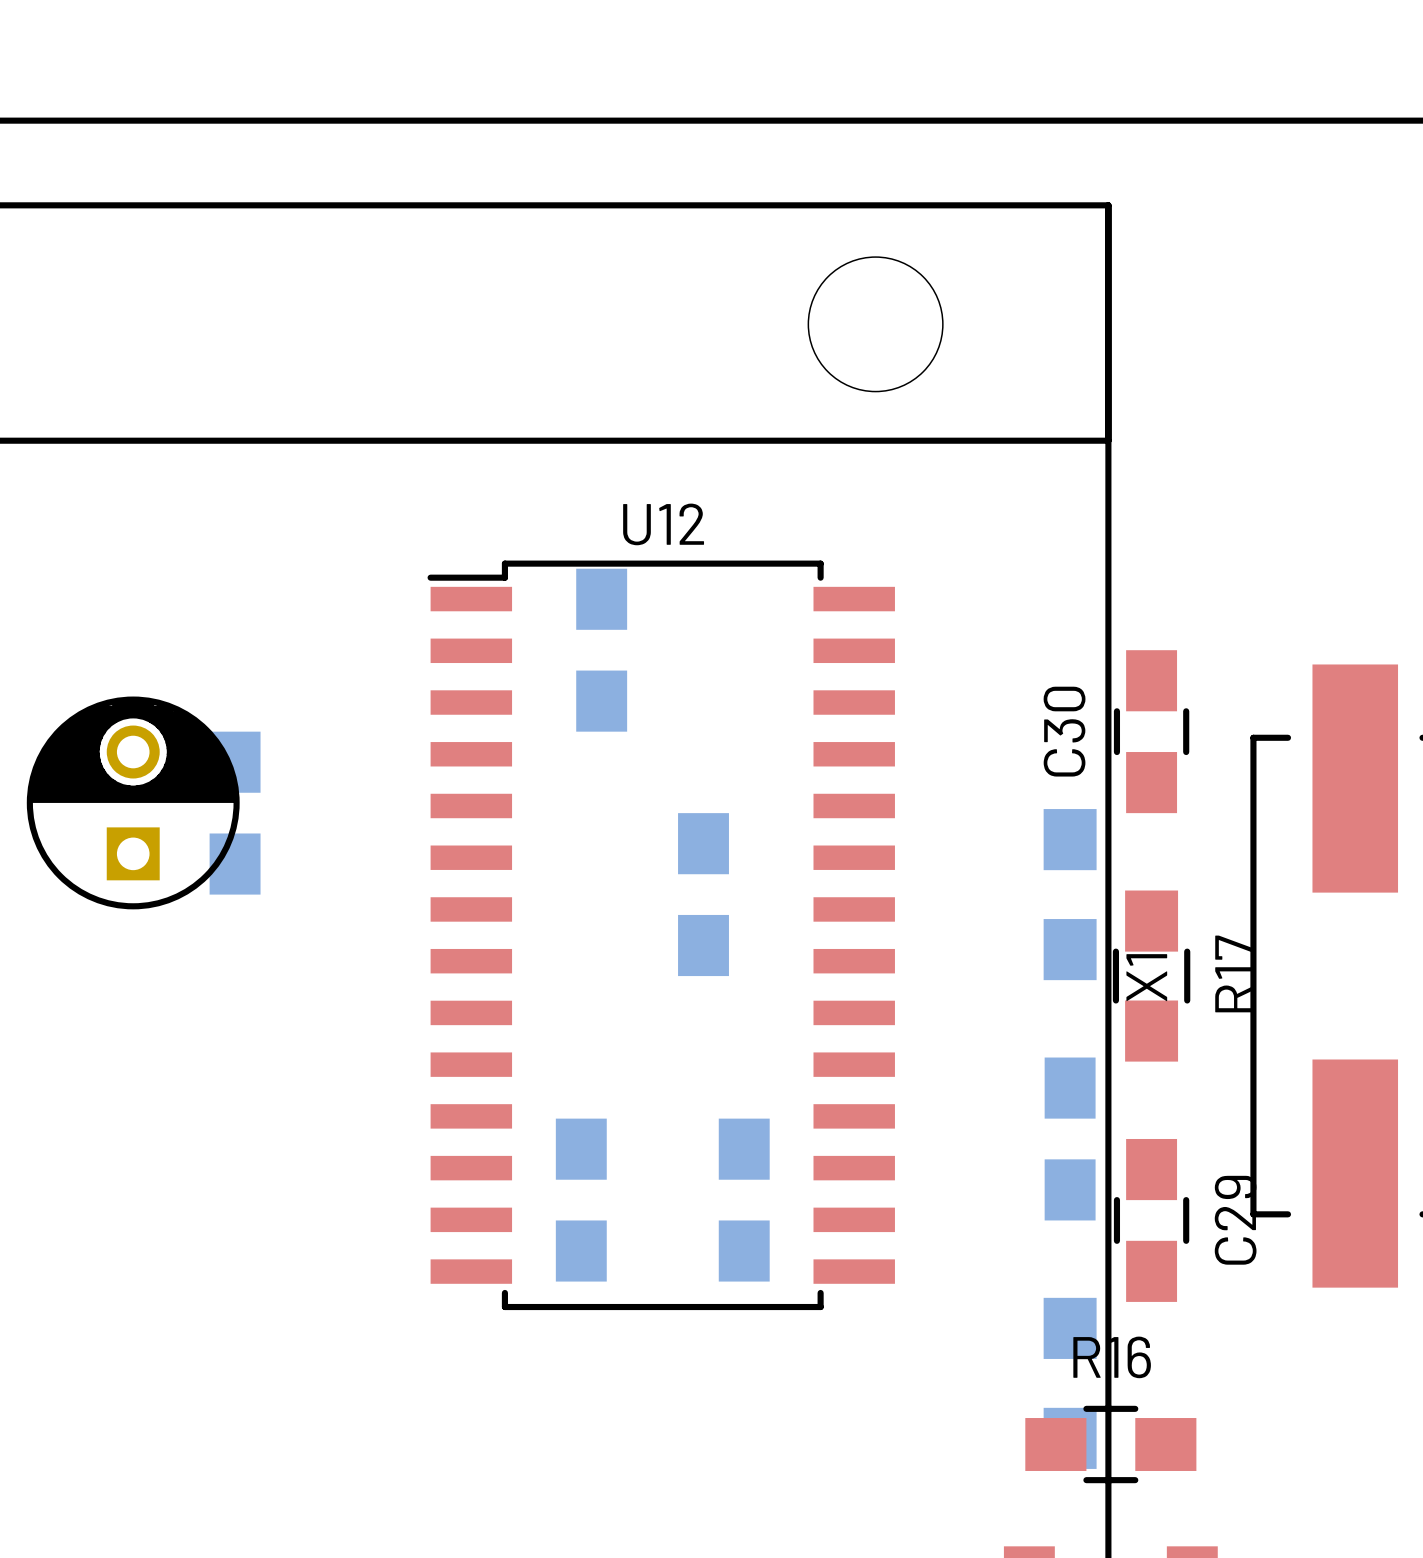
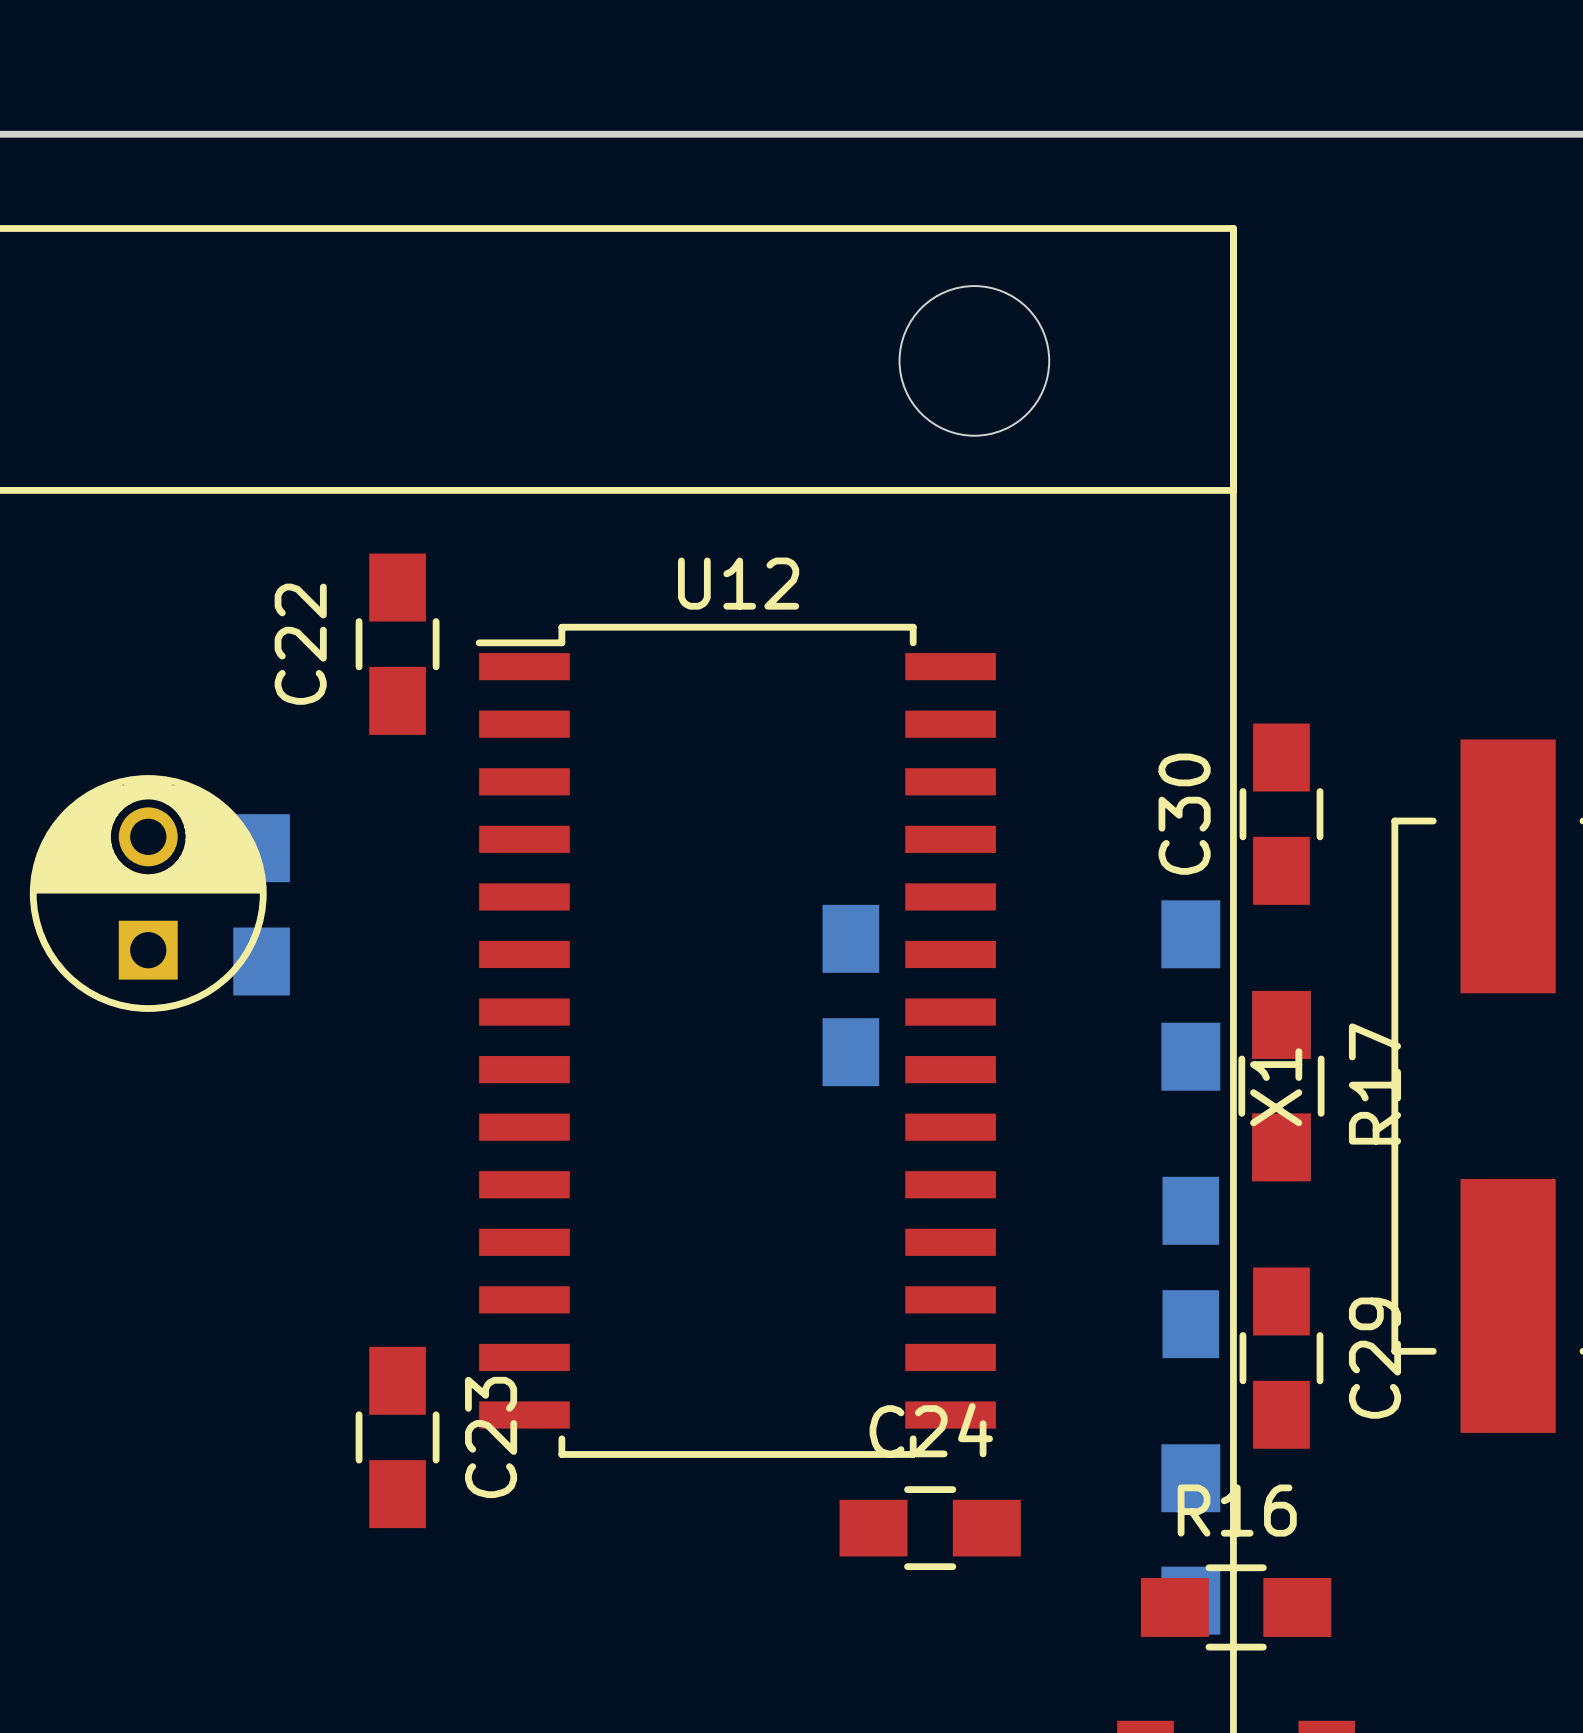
C22 side: bottom (601, 650) -> top (397, 644)
part position: (703, 894) -> (850, 995)
C23 side: bottom (581, 1200) -> top (397, 1437)
C24 side: bottom (744, 1200) -> top (930, 1528)

